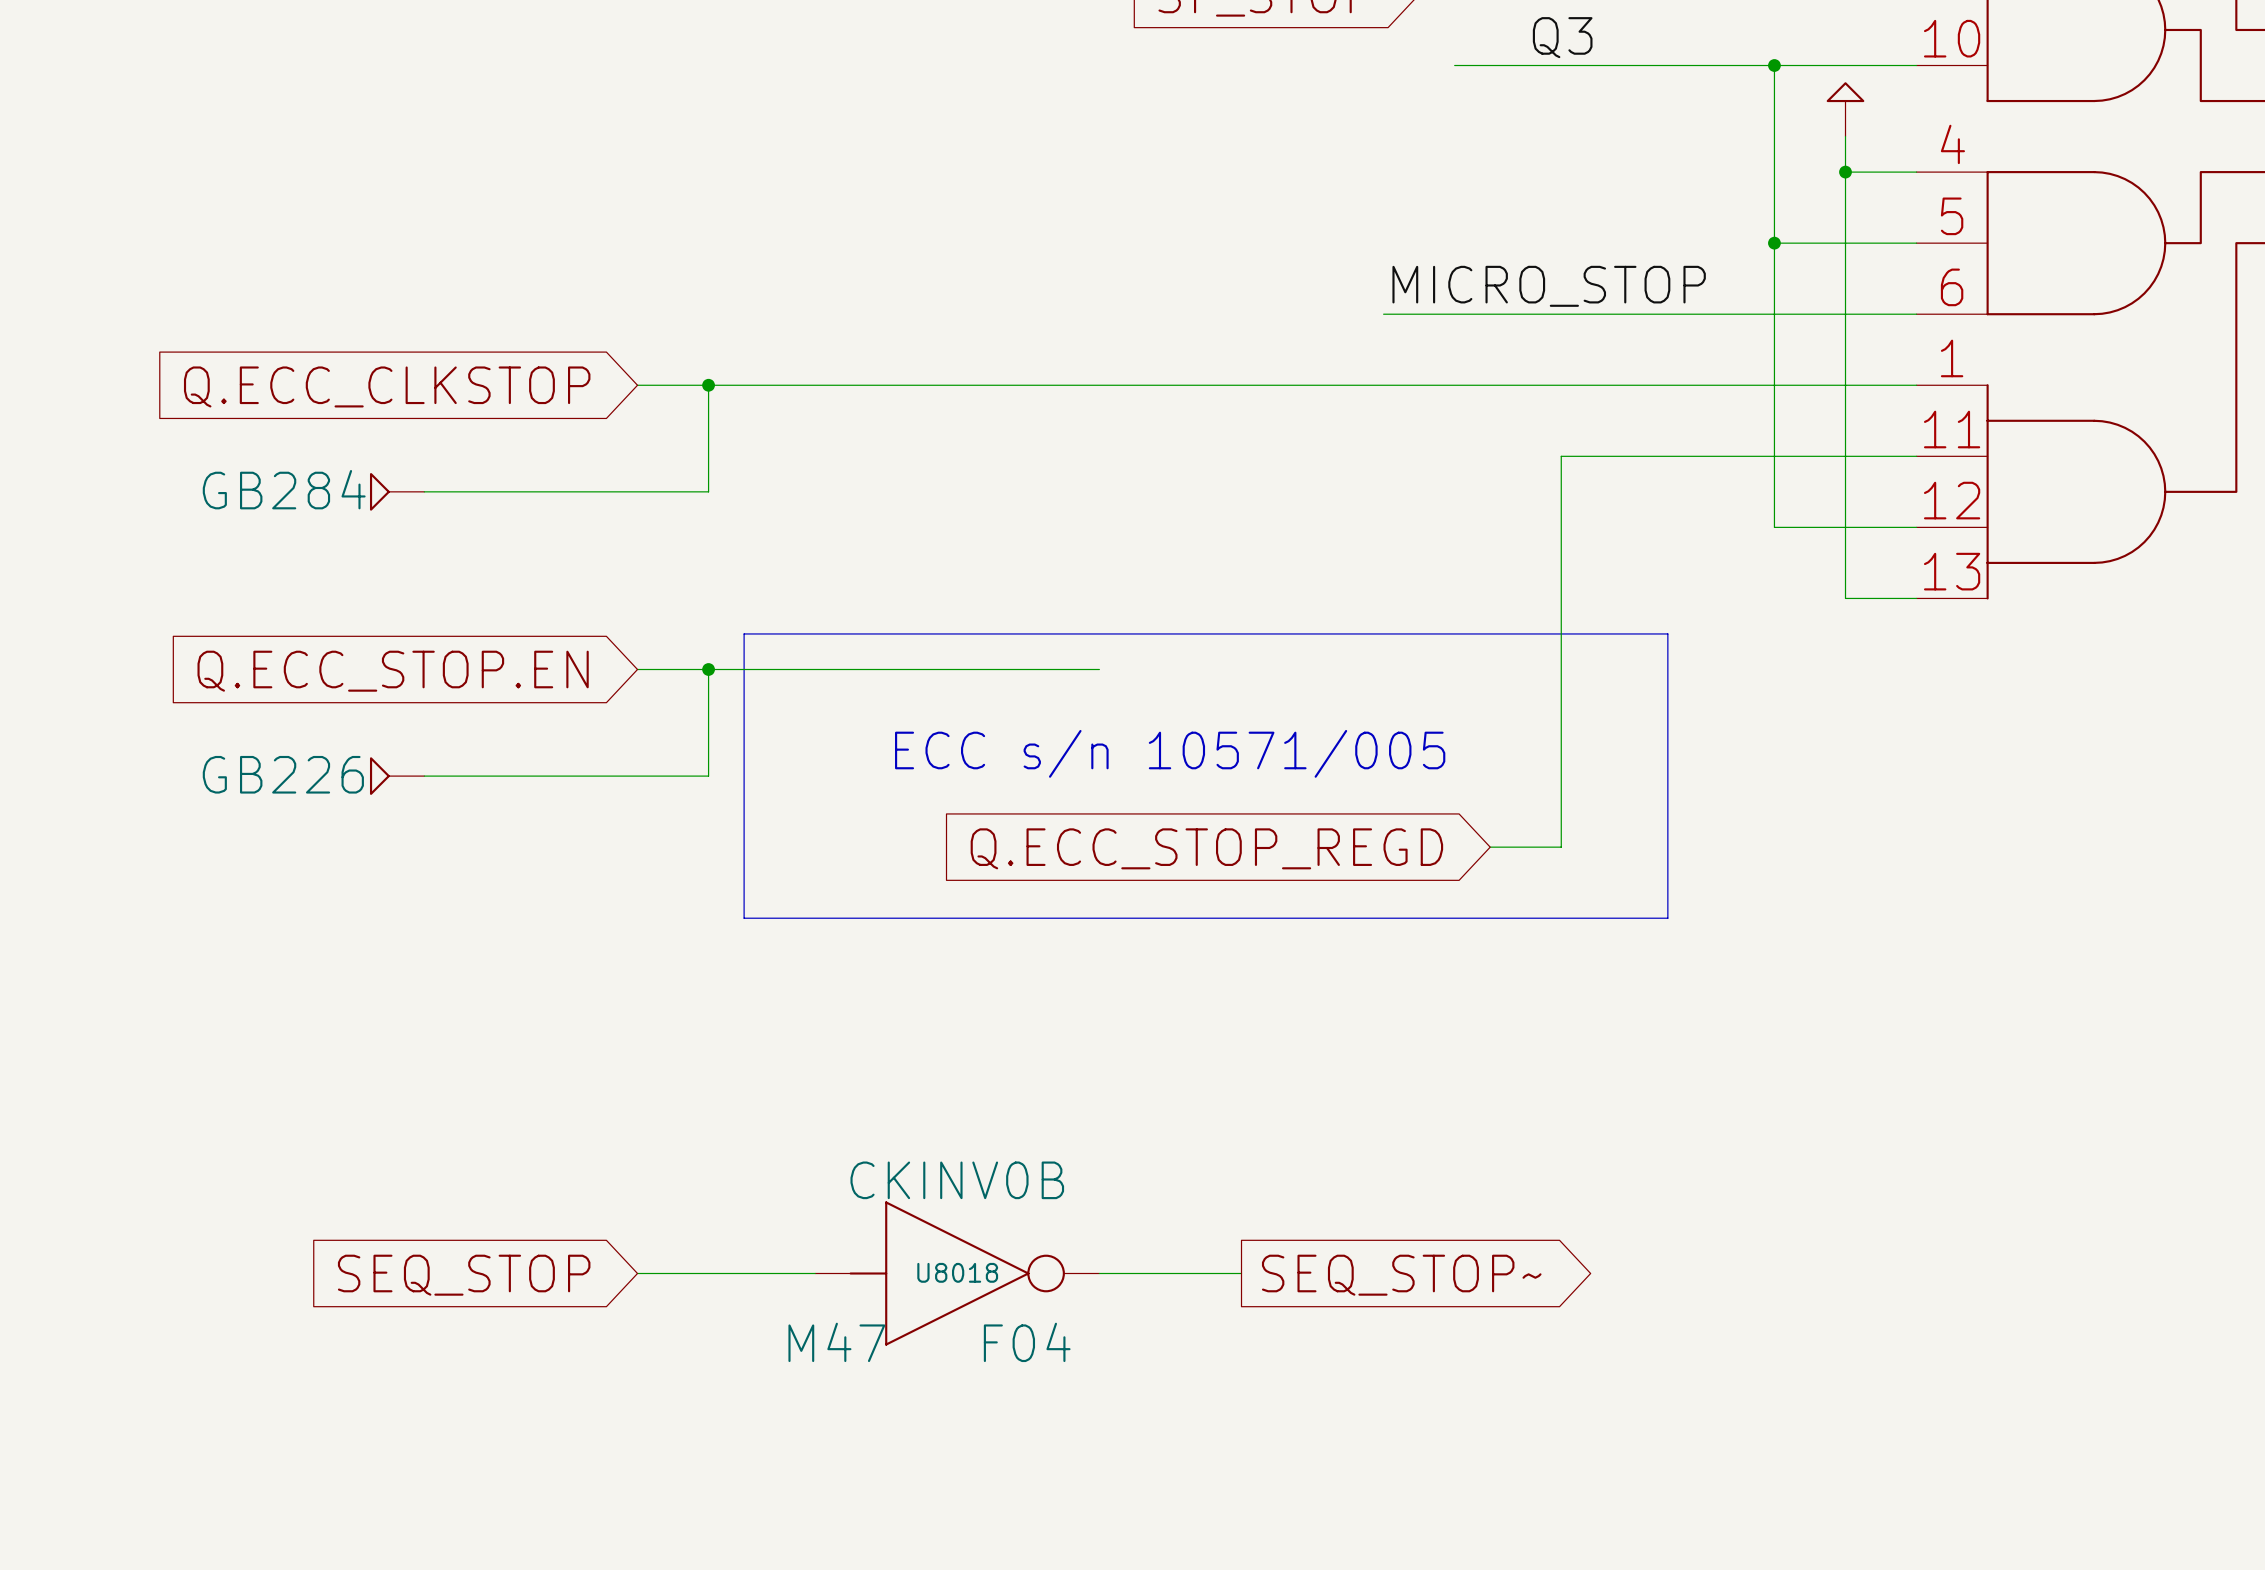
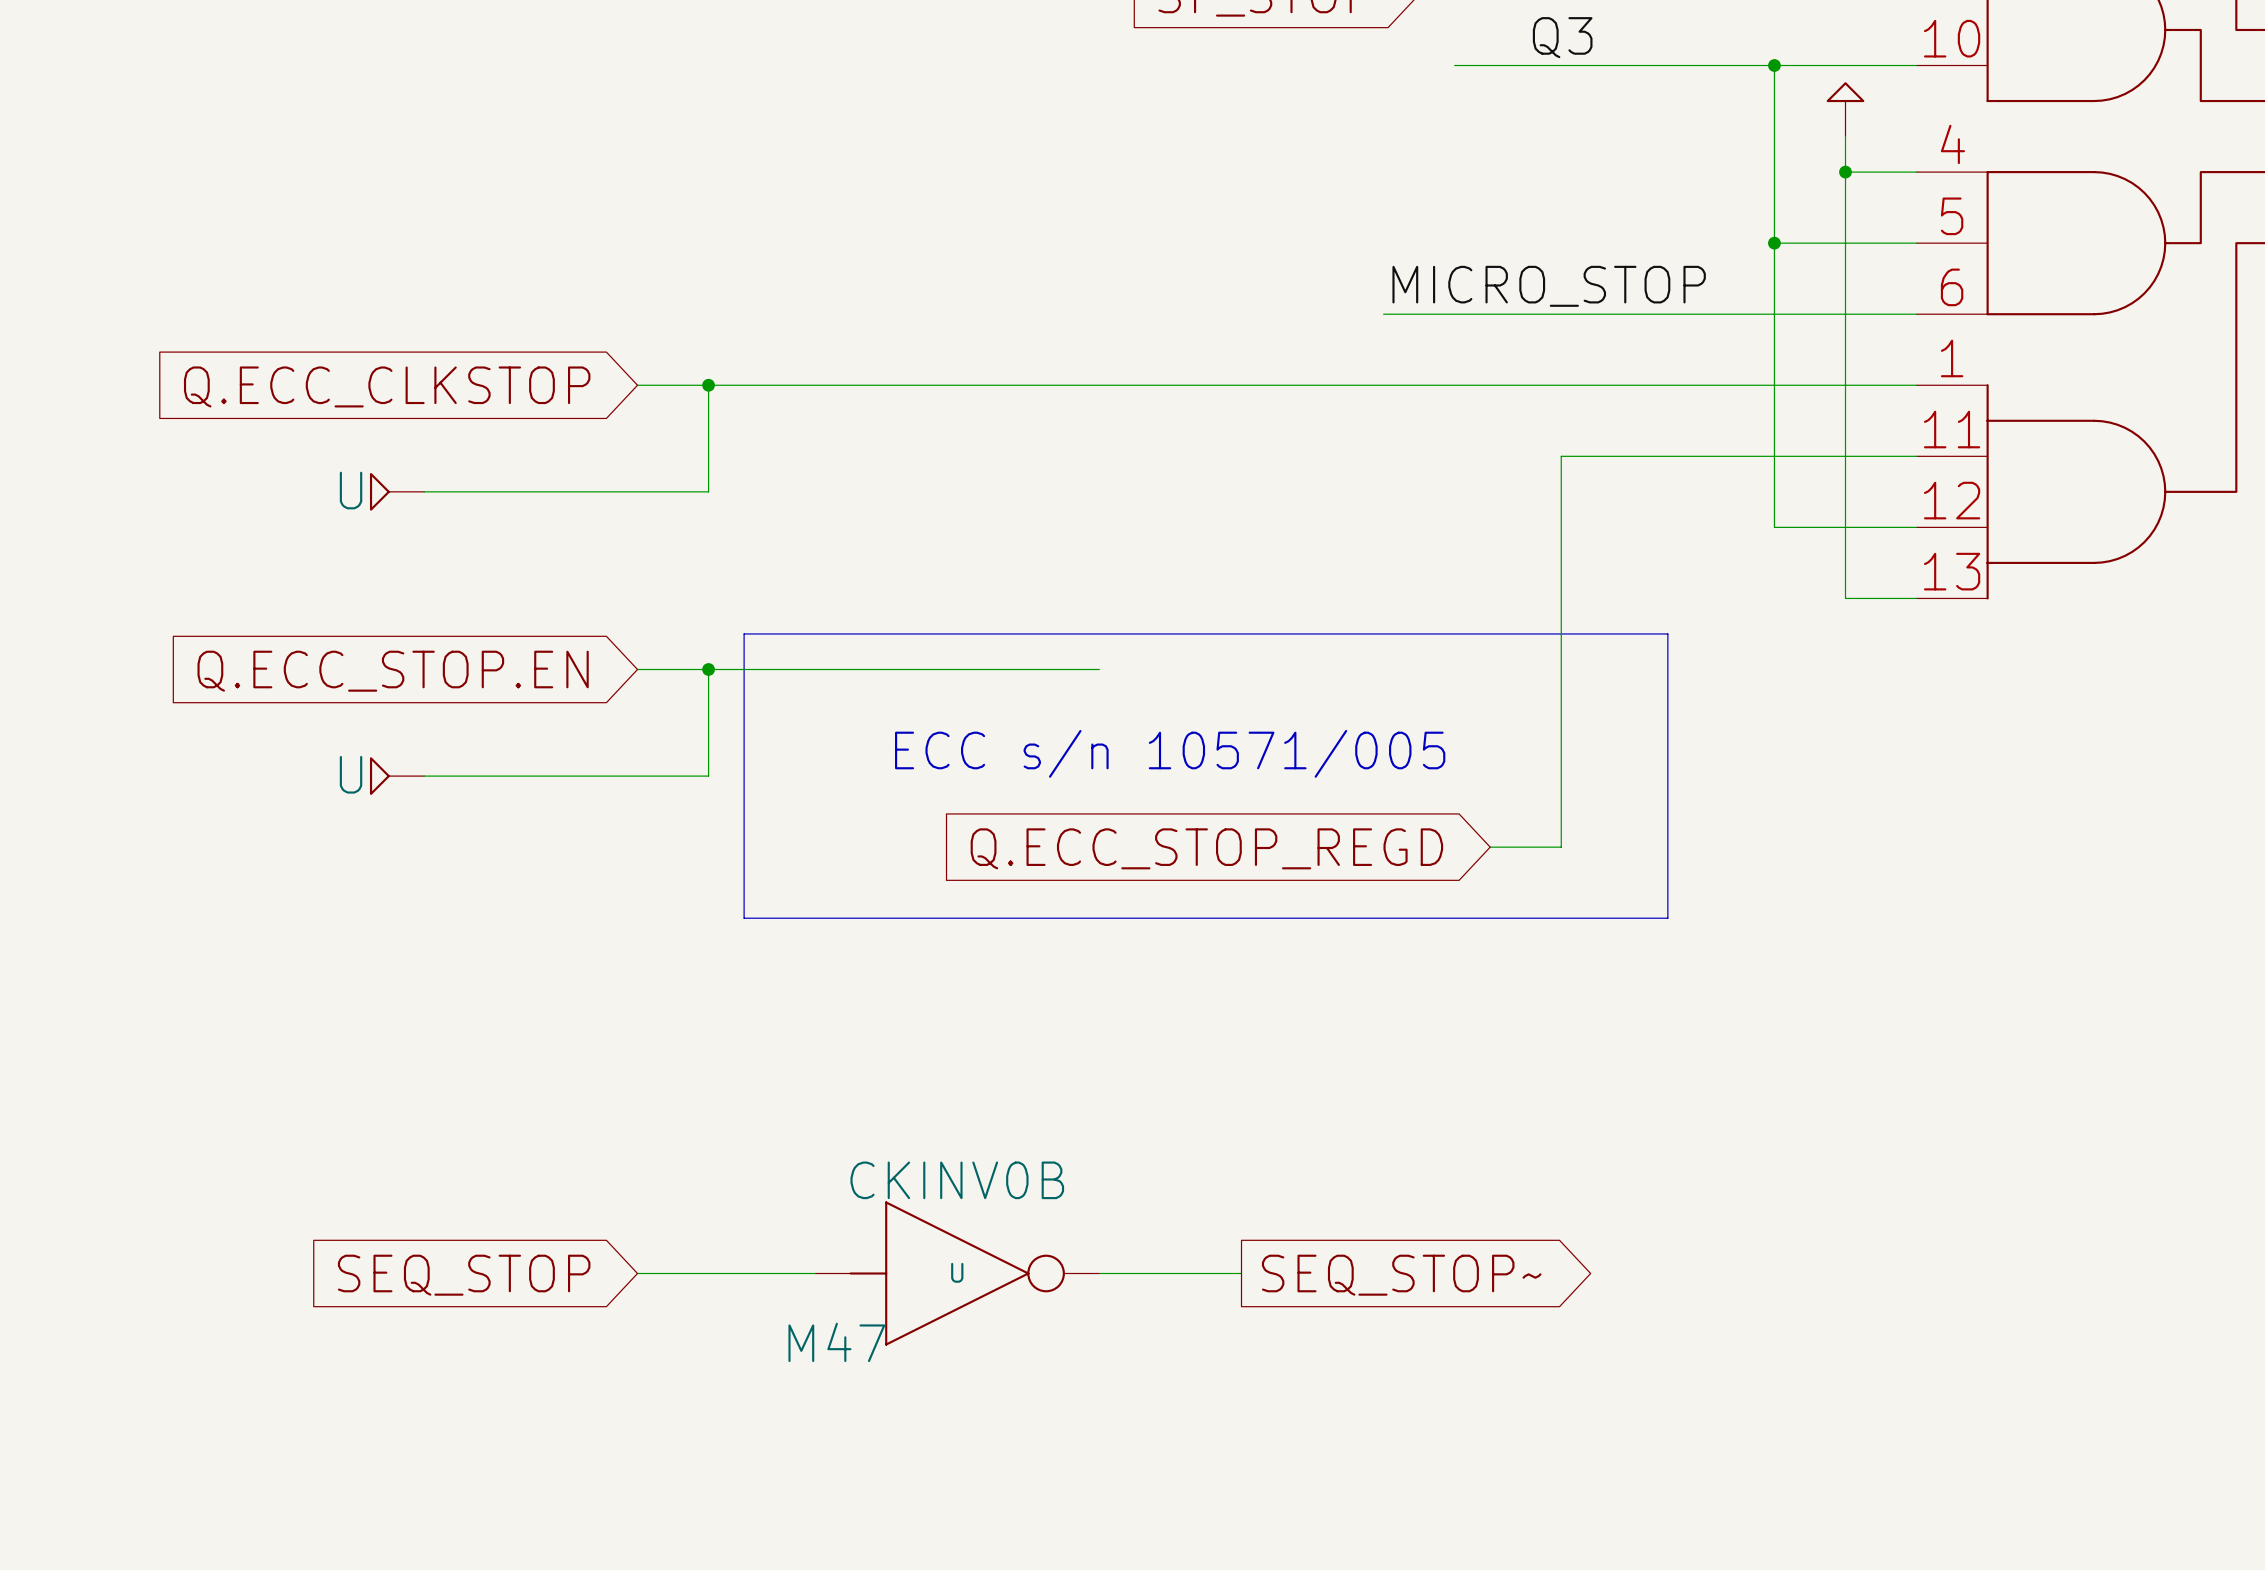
GB284 name: GB284 (284, 489) -> U (351, 490)
GB226 name: GB226 (283, 774) -> U (351, 774)
U8018 name: U8018 (957, 1272) -> U (957, 1272)
U8018 value: F04 (1027, 1342) -> none

